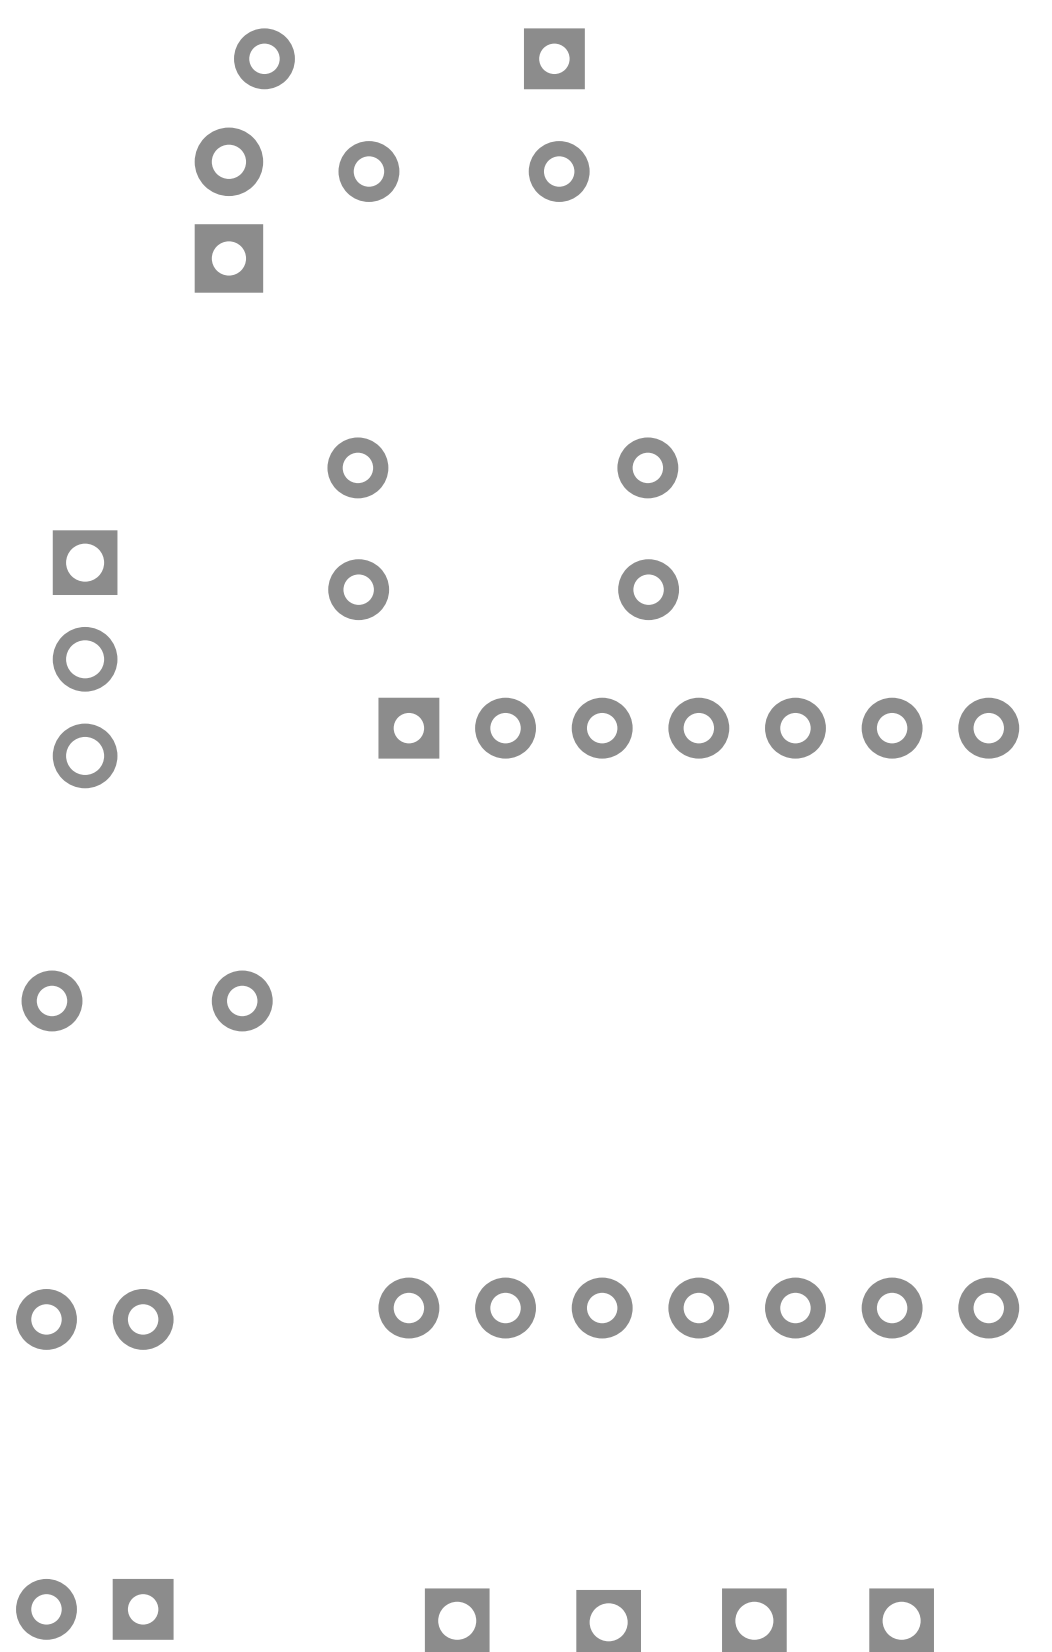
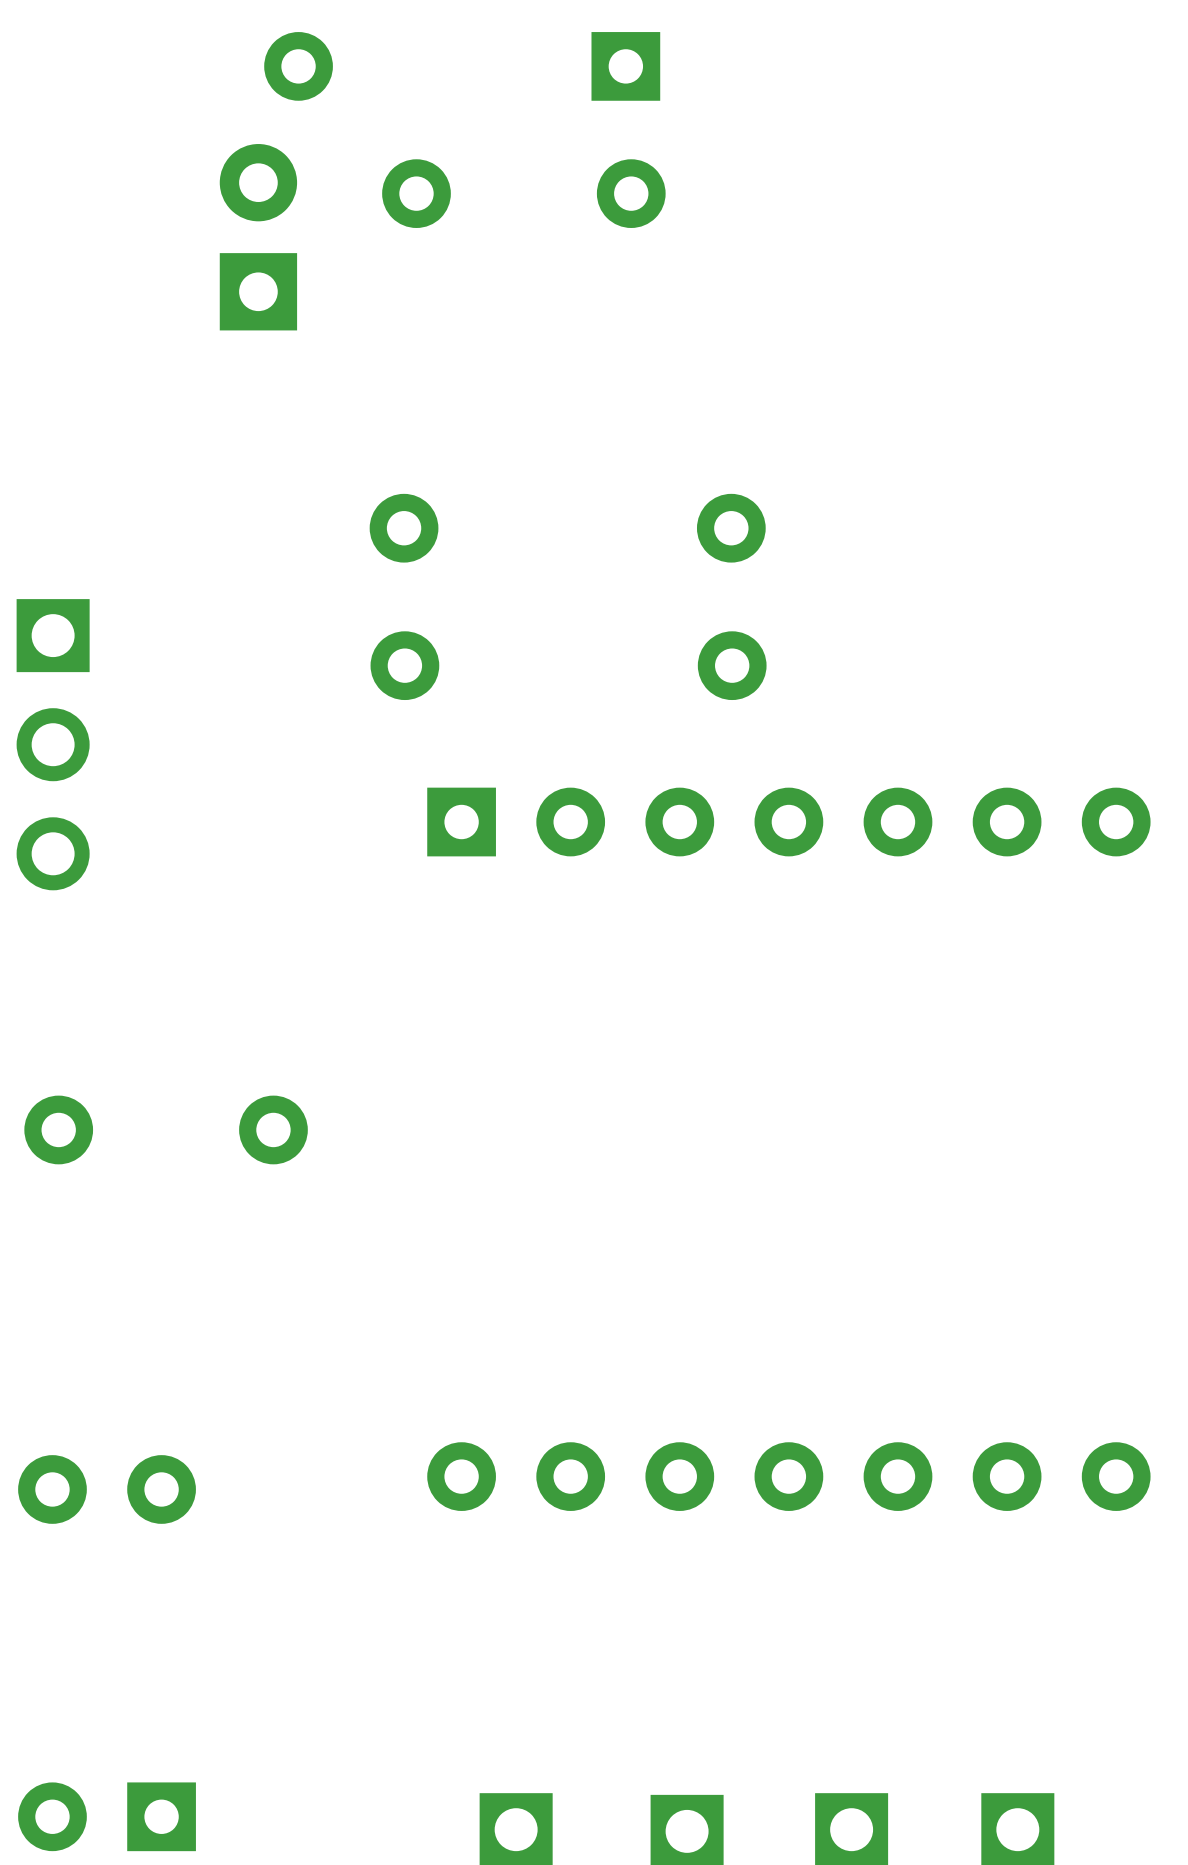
part position: (85, 659) -> (53, 744)

